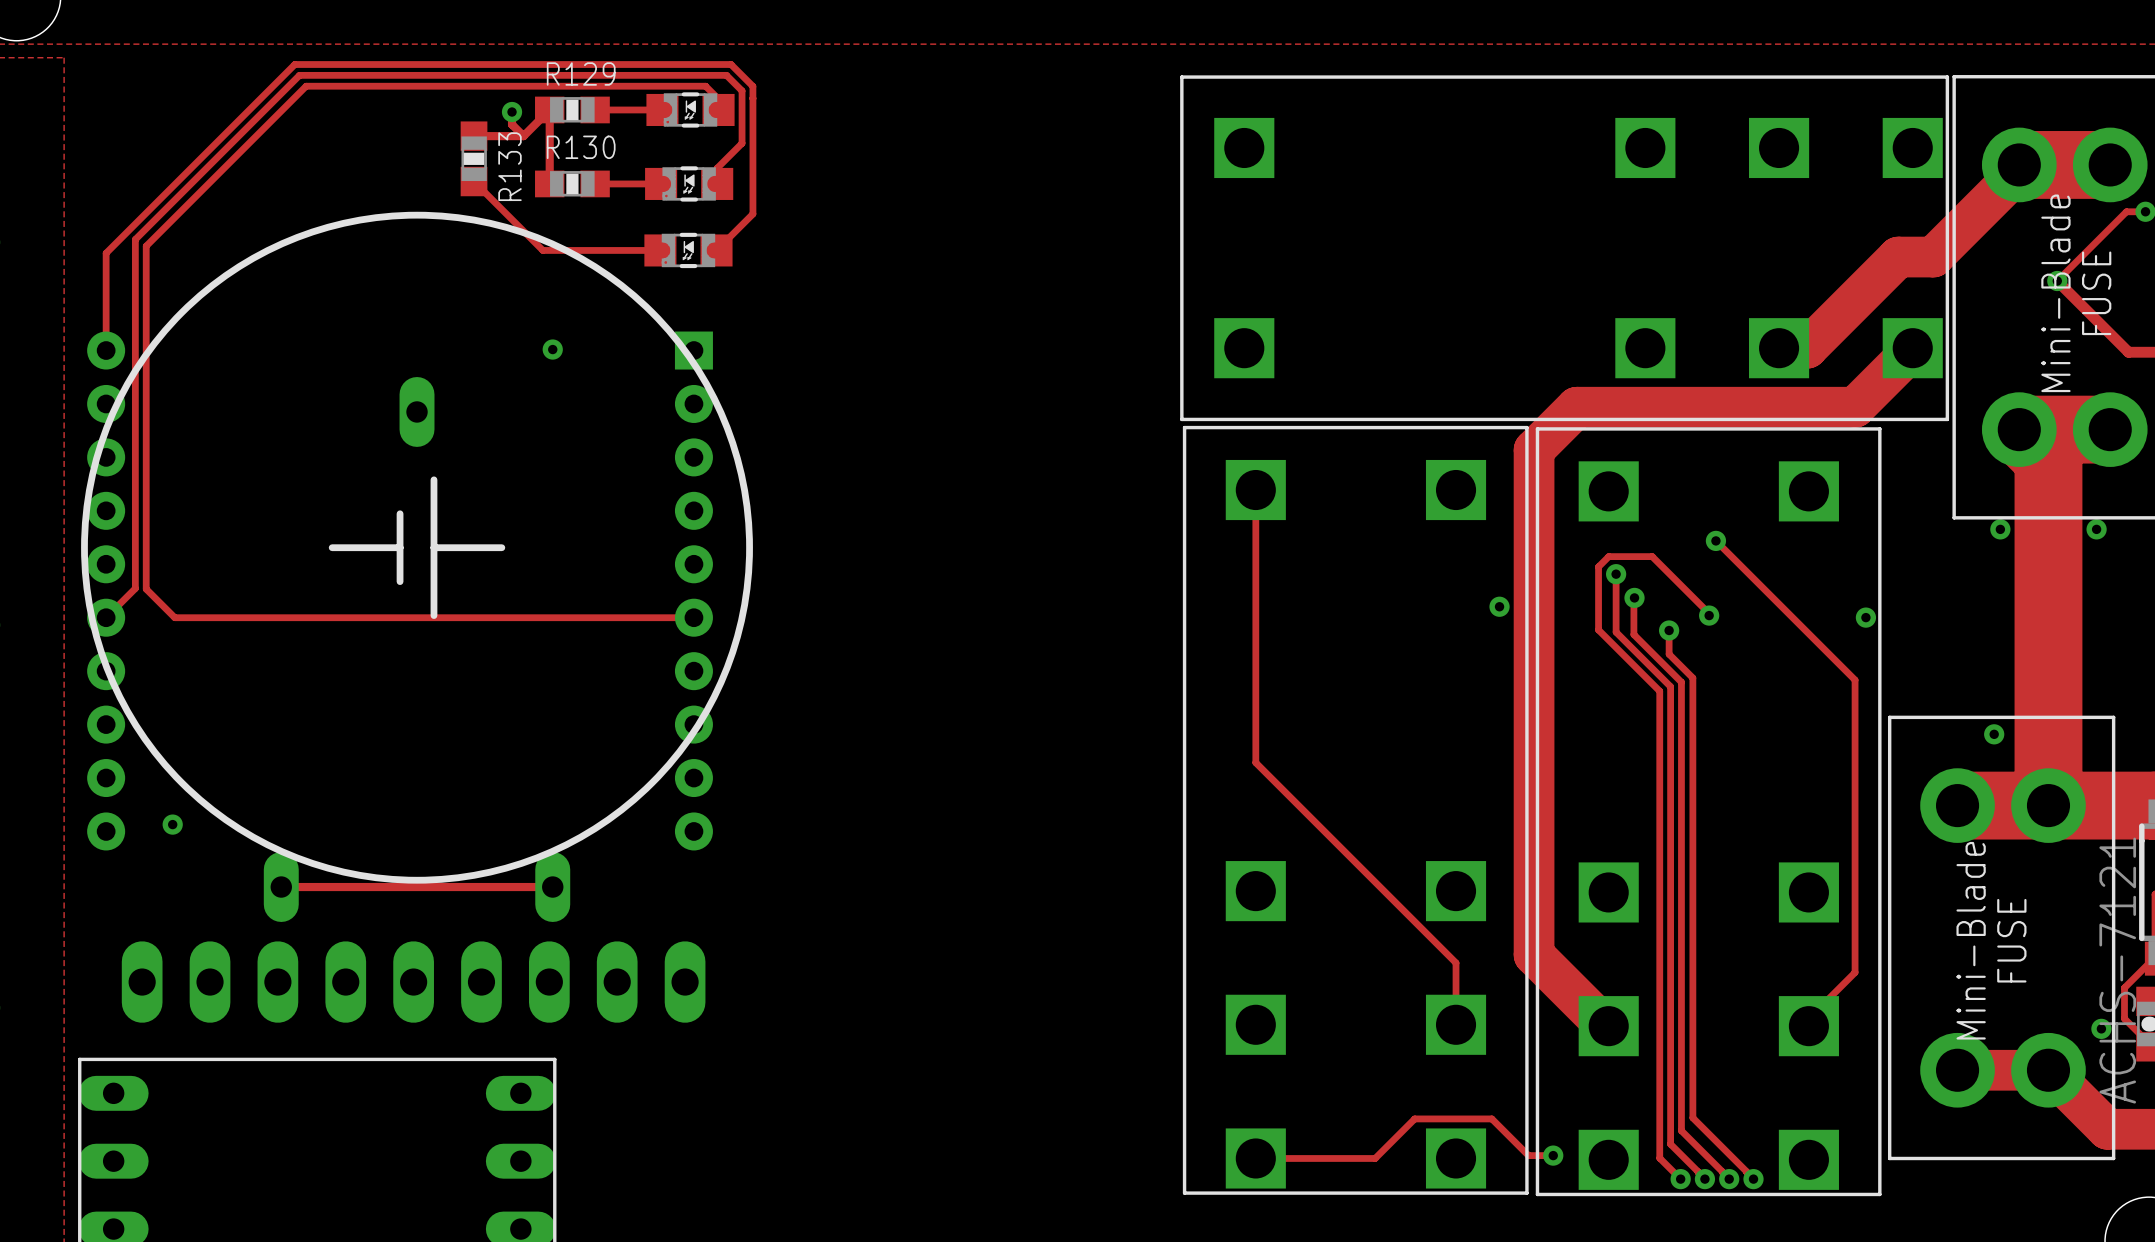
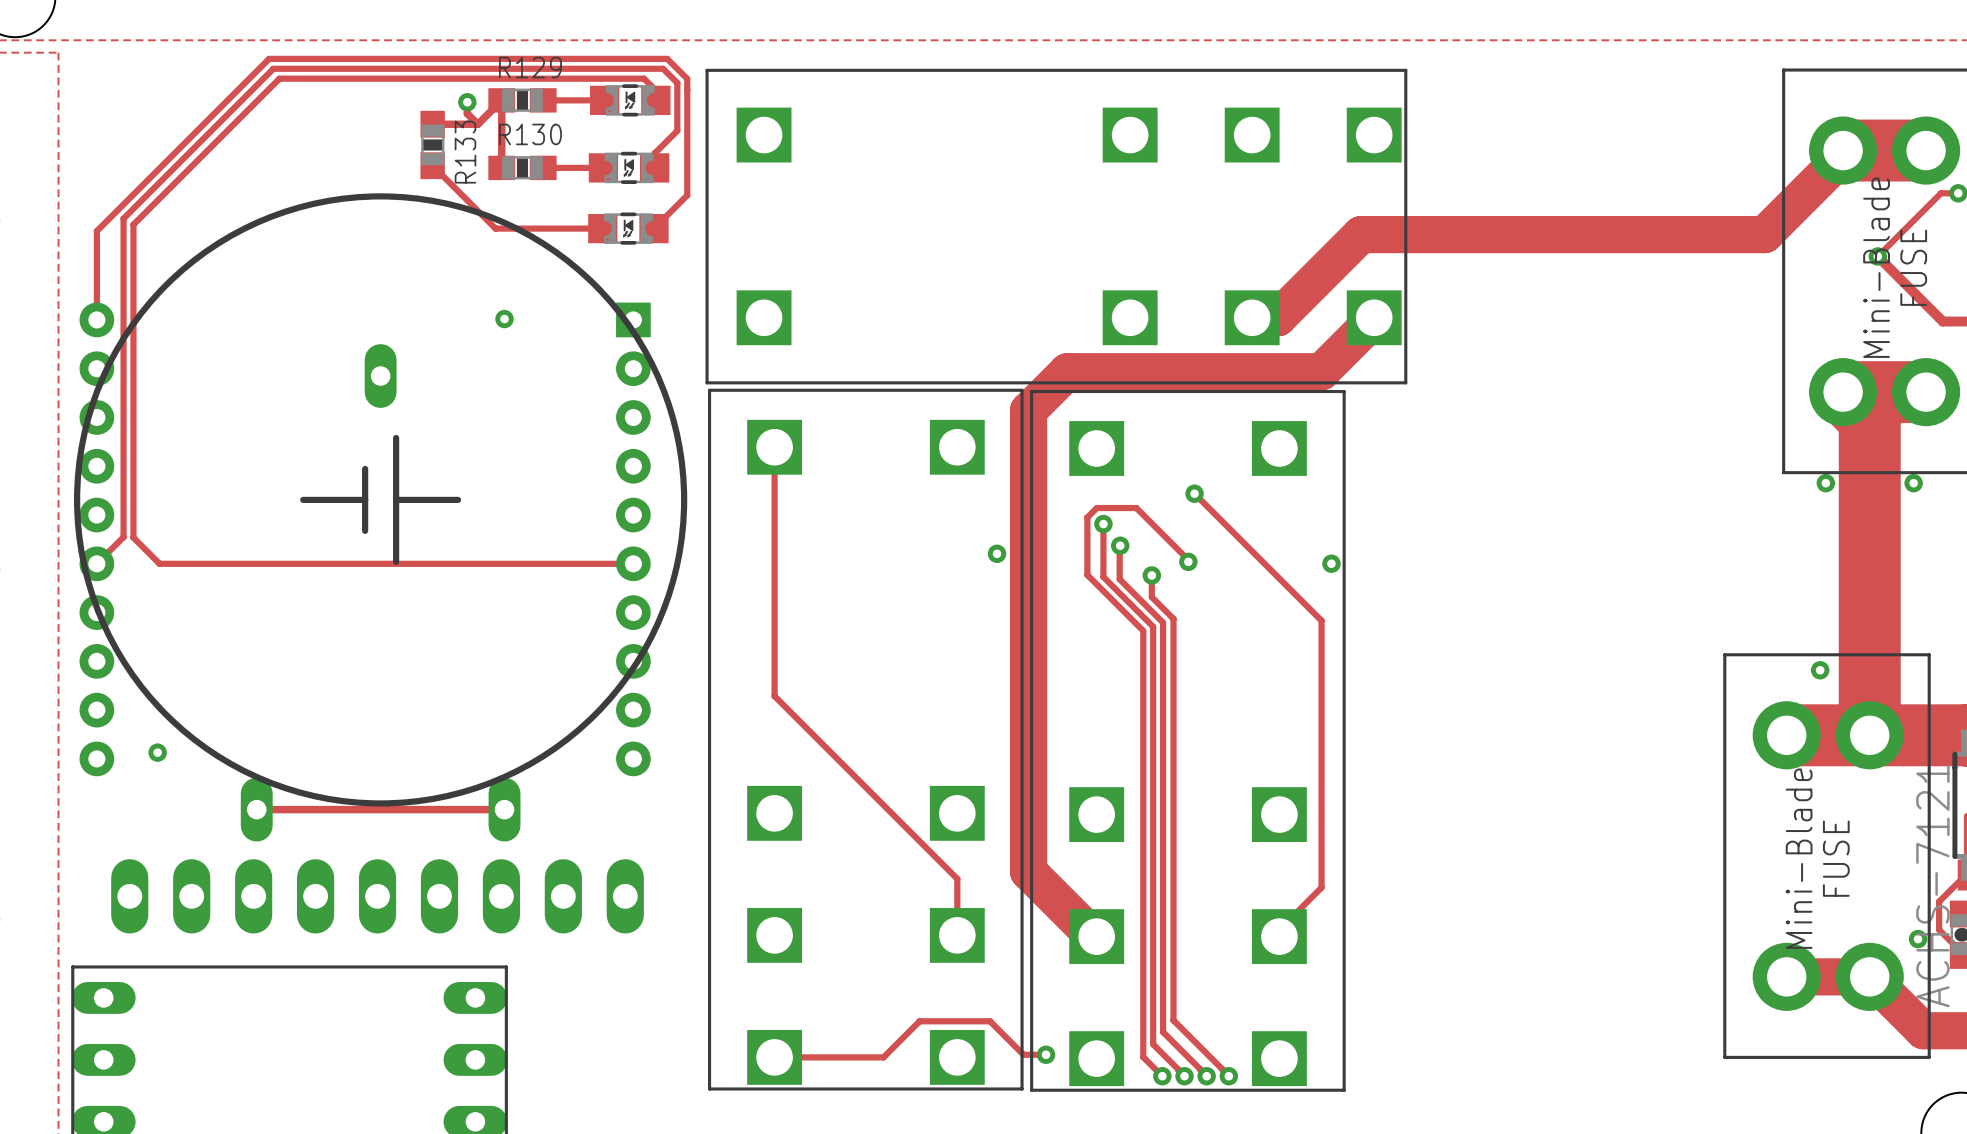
part: none -> (1056, 226)
part: (1564, 248) -> none
track: (1898, 257) (1807, 348) (1779, 348) -> (1732, 234) (1361, 234) (1277, 317) (1252, 317)
track: (1912, 348) (1855, 407) (1576, 407) (1534, 449) (1534, 954) (1605, 1026) (1608, 1026) -> (1374, 317) (1321, 371) (1067, 371) (1028, 410) (1028, 871) (1093, 936) (1096, 936)
track: (1255, 490) (1255, 762) (1456, 962) (1456, 1024) -> (774, 447) (774, 696) (957, 878) (957, 935)
via: none -> (1194, 493)
track: (1715, 540) (1855, 680) (1855, 972) (1808, 1018) (1808, 1026) -> (1194, 493) (1321, 620) (1321, 887) (1279, 929) (1279, 936)
via: (1715, 540) -> none
via: none -> (1103, 524)
track: (1616, 574) (1616, 632) (1670, 686) (1670, 1144) (1704, 1179) -> (1103, 524) (1103, 577) (1153, 626) (1153, 1044) (1184, 1076)
via: (1616, 574) -> none
via: none -> (1120, 545)
track: (1634, 597) (1633, 634) (1681, 682) (1681, 1130) (1729, 1179) -> (1120, 545) (1119, 579) (1163, 622) (1163, 1032) (1206, 1076)
via: (1634, 597) -> none
via: none -> (997, 553)
via position: (1499, 606) -> (1331, 563)
via: none -> (1188, 561)
track: (1709, 615) (1652, 556) (1608, 556) (1598, 566) (1598, 629) (1659, 691) (1659, 1158) (1680, 1179) -> (1188, 561) (1136, 508) (1096, 508) (1087, 517) (1087, 575) (1143, 630) (1143, 1057) (1162, 1076)
via: (1709, 615) -> none
via: (1865, 617) -> none
via: none -> (1151, 575)
track: (1669, 630) (1669, 654) (1692, 678) (1692, 1117) (1753, 1179) -> (1151, 575) (1151, 597) (1173, 618) (1173, 1020) (1228, 1076)
via: (1669, 630) -> none
part: none -> (865, 739)
part position: (1355, 810) -> (1187, 740)
part: (1708, 811) -> none
via: none -> (1046, 1054)
track: (1553, 1155) (1528, 1155) (1491, 1118) (1414, 1118) (1375, 1158) (1255, 1159) -> (1046, 1054) (1023, 1054) (990, 1021) (919, 1021) (883, 1057) (774, 1057)
via: (1553, 1155) -> none
via: none -> (1162, 1076)
via: none -> (1184, 1076)
via: none -> (1206, 1076)
via: none -> (1228, 1076)
via: (1680, 1179) -> none
via: (1704, 1179) -> none
via: (1729, 1179) -> none
via: (1753, 1179) -> none

